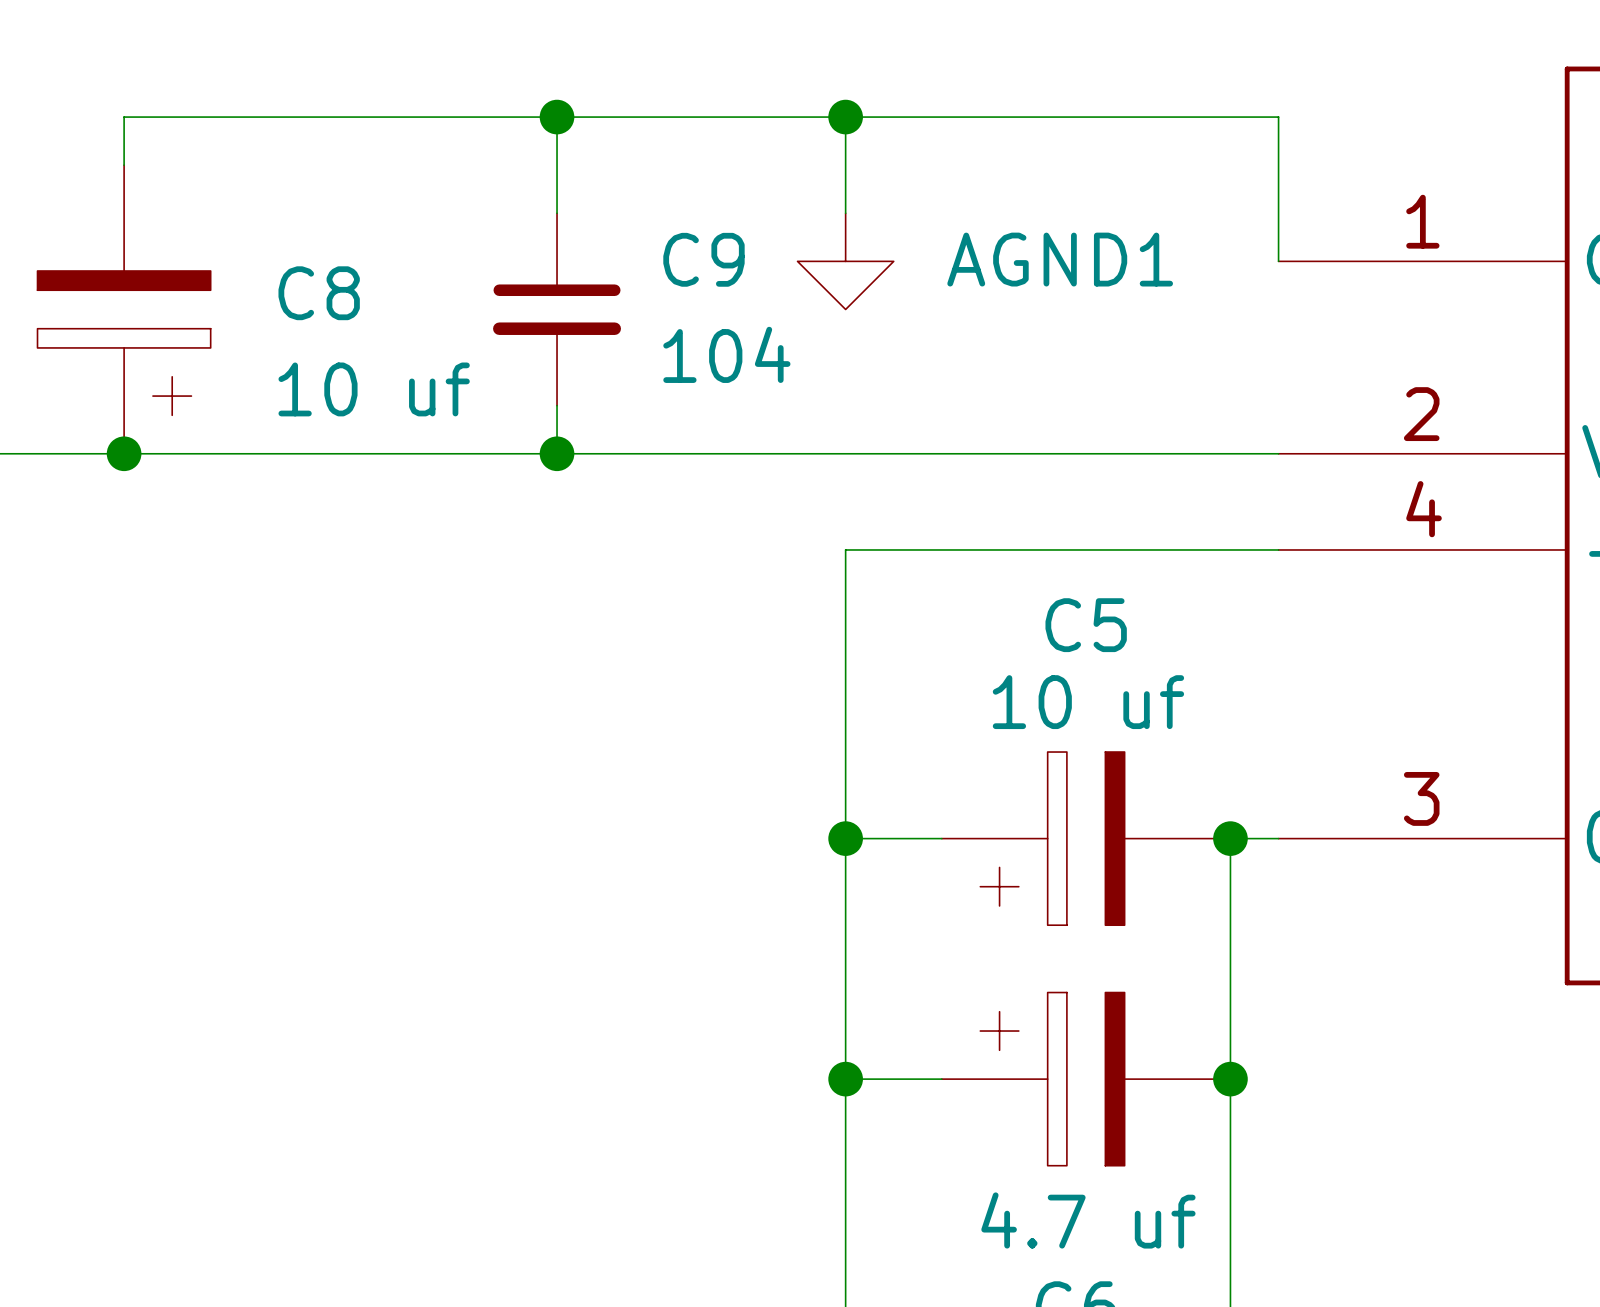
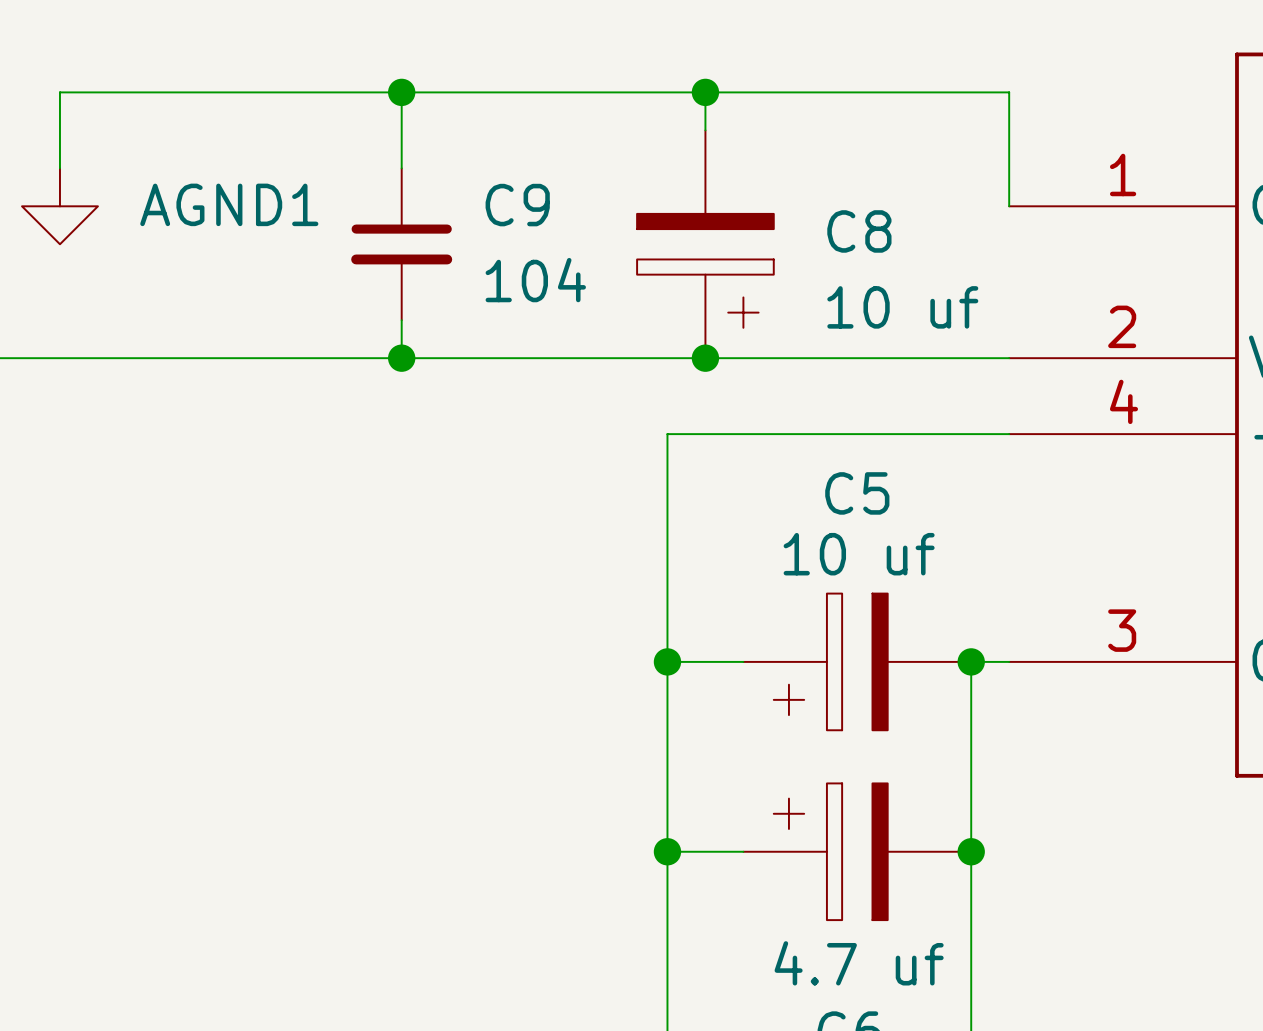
wire: (124, 117) (124, 165) -> (97, 92) (59, 92) (59, 168)
wire: (557, 117) (557, 213) -> (401, 92) (401, 168)
junction position: (557, 117) -> (401, 92)
wire: (845, 117) (845, 213) -> none
junction position: (845, 117) -> (705, 92)
wire: none -> (705, 92) (705, 130)
power symbol position: AGND1 (845, 261) -> AGND1 (59, 206)
C8 position: (124, 309) -> (705, 244)
C9 position: (557, 309) -> (401, 244)
wire: (557, 405) (557, 453) -> (401, 320) (401, 358)
junction: (124, 453) -> none
junction position: (557, 453) -> (401, 358)
junction: none -> (705, 358)

